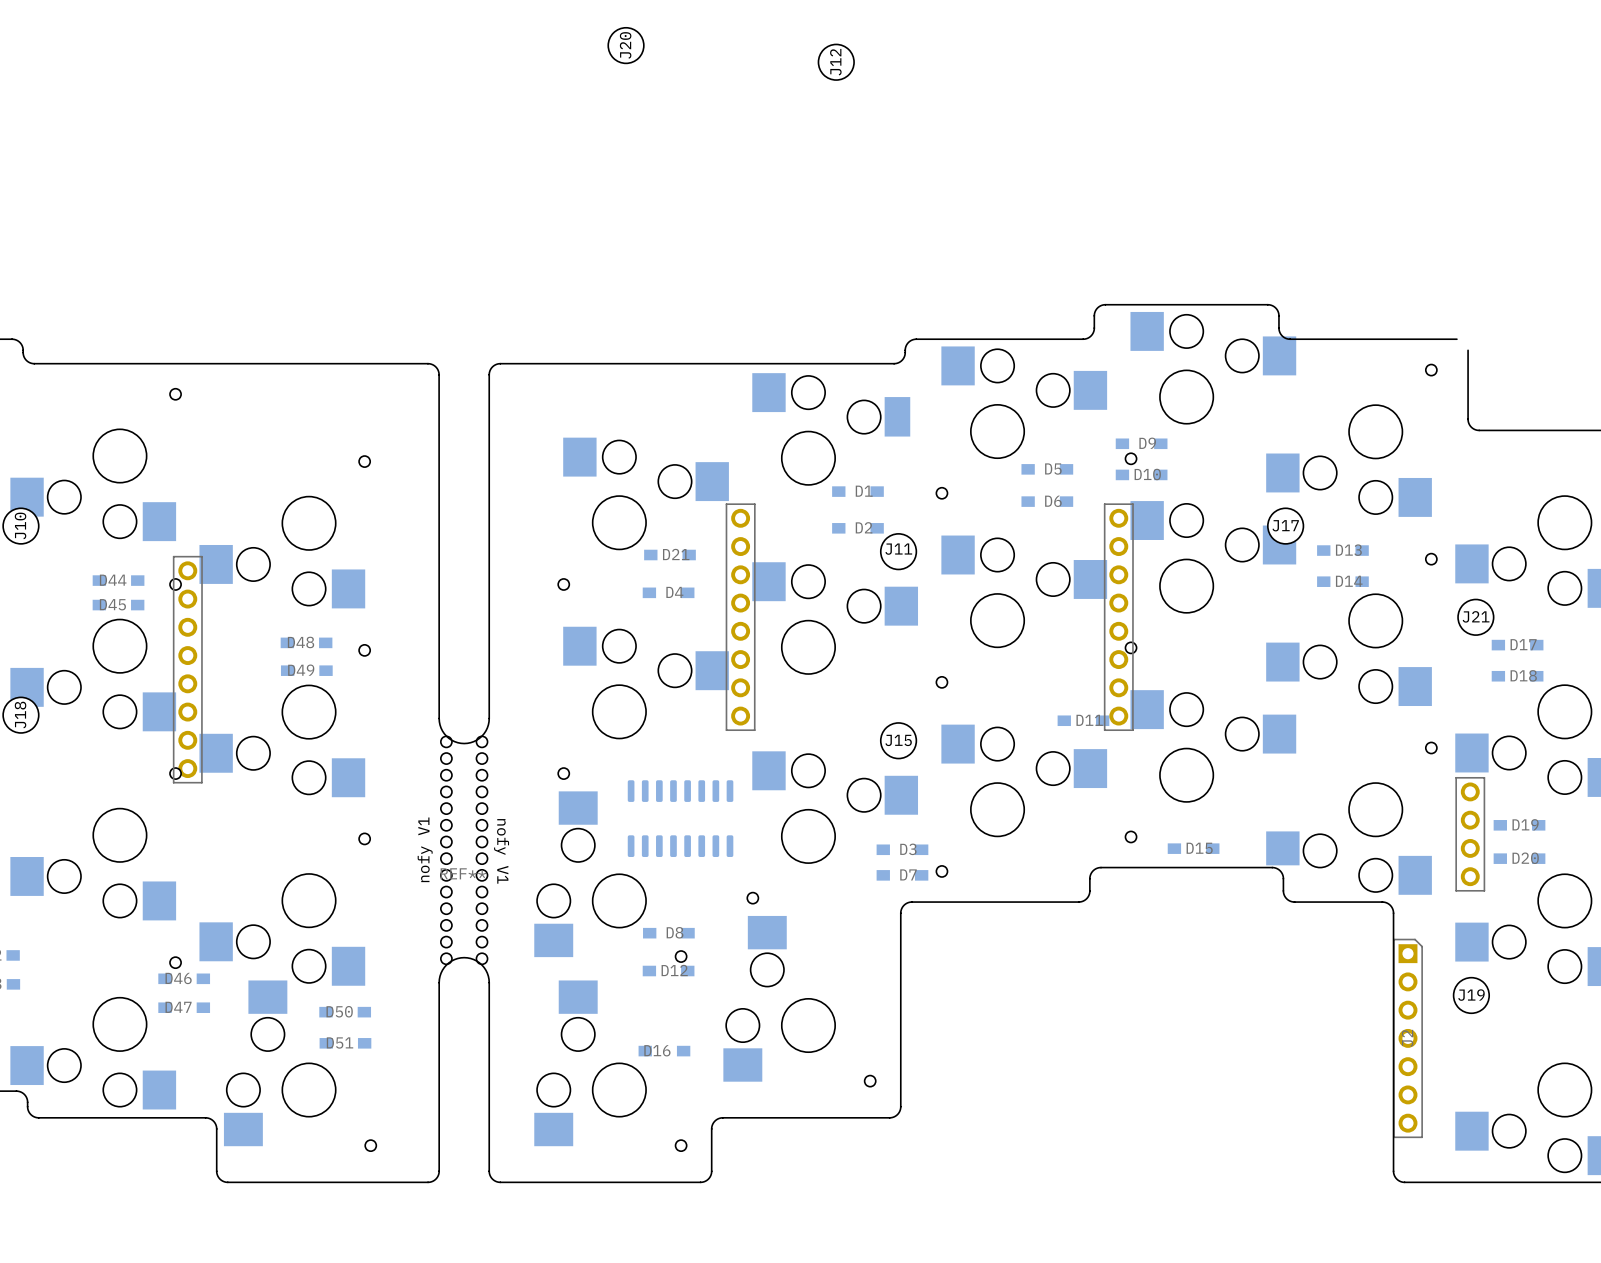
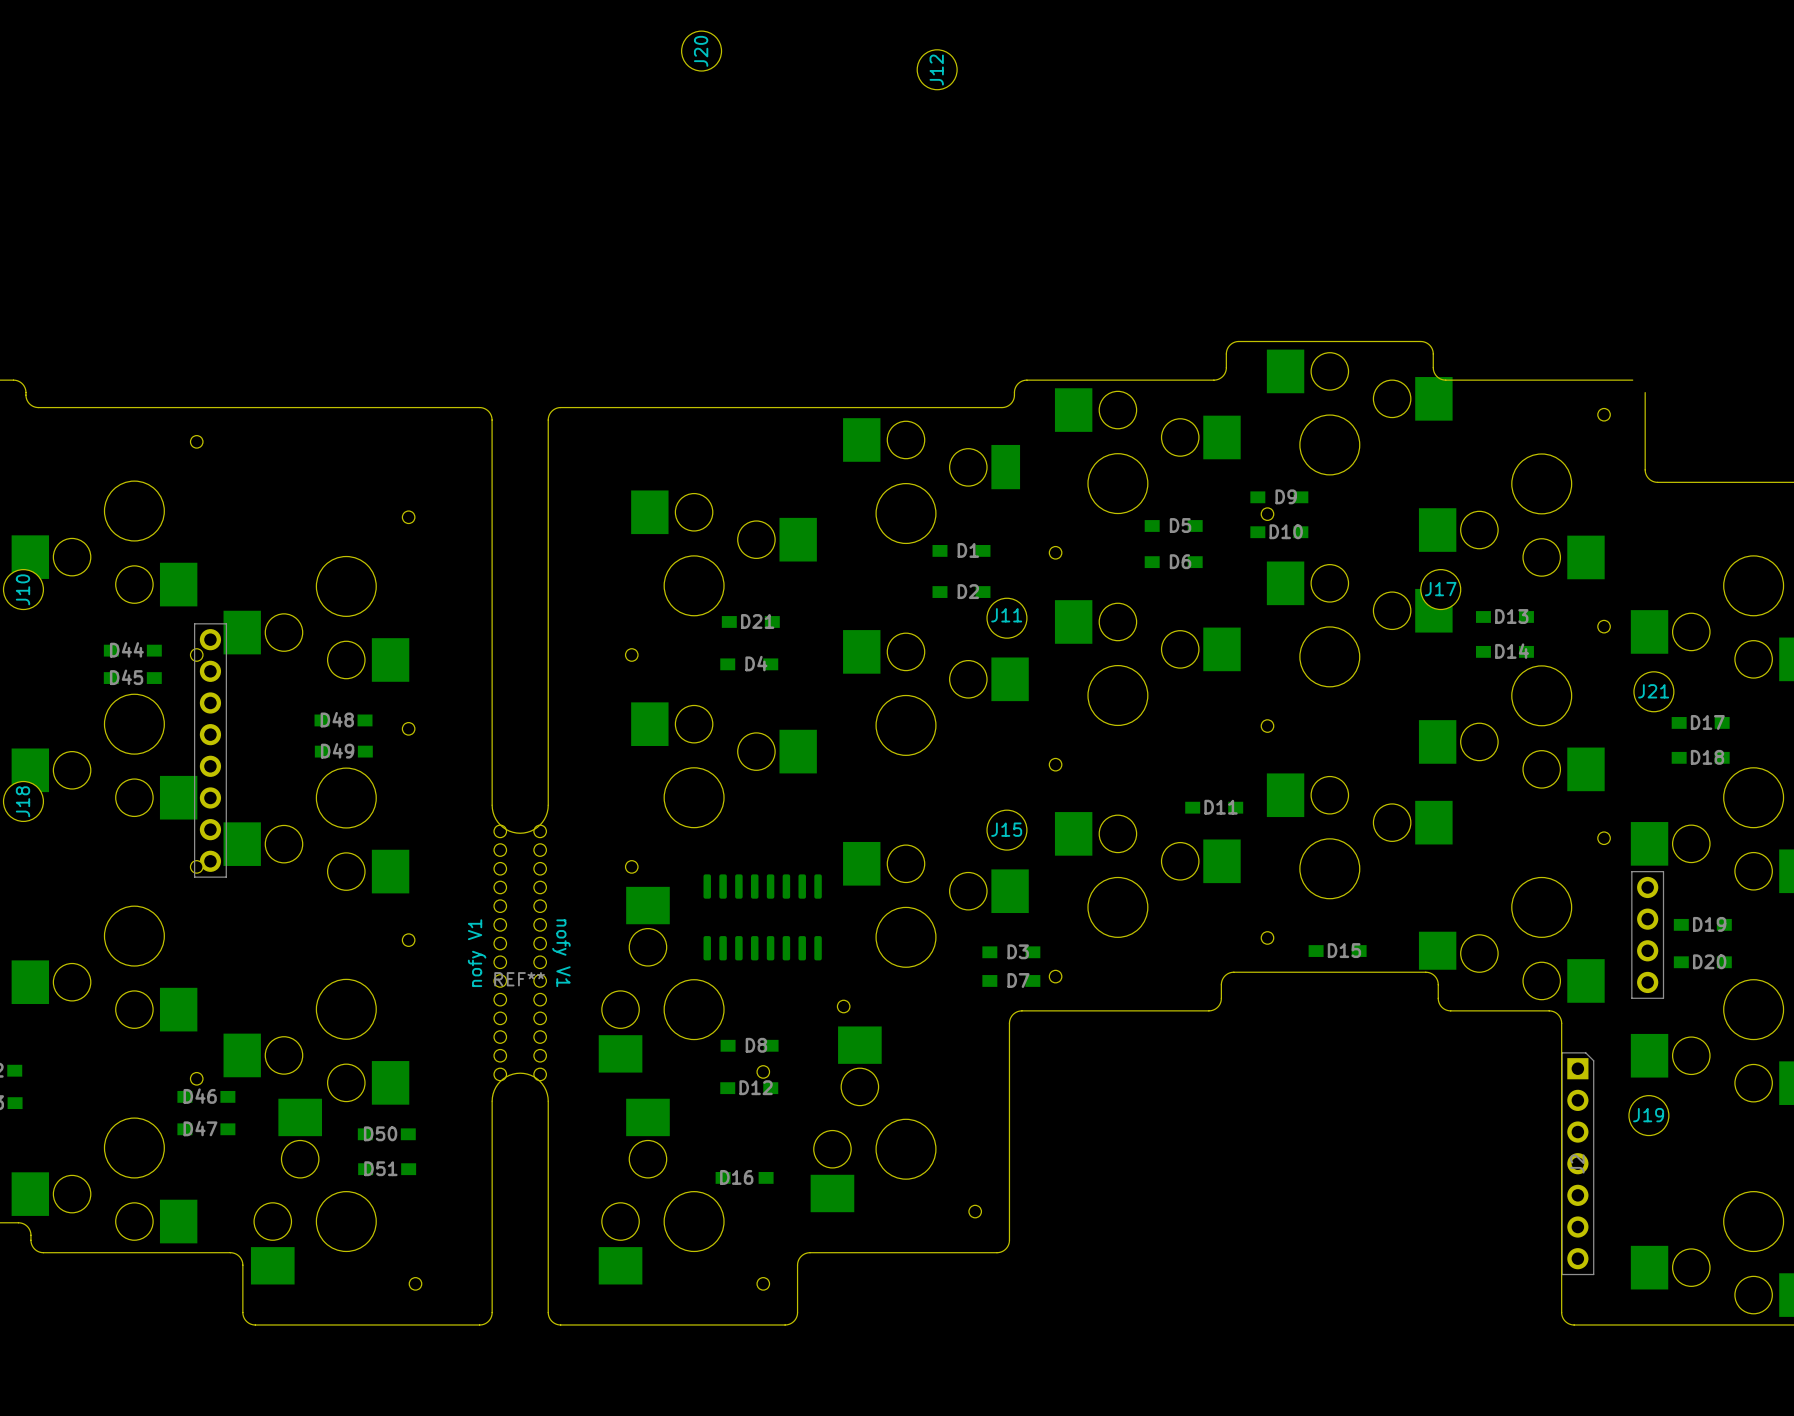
part: (740, 617) -> none
part: (1118, 617) -> none

